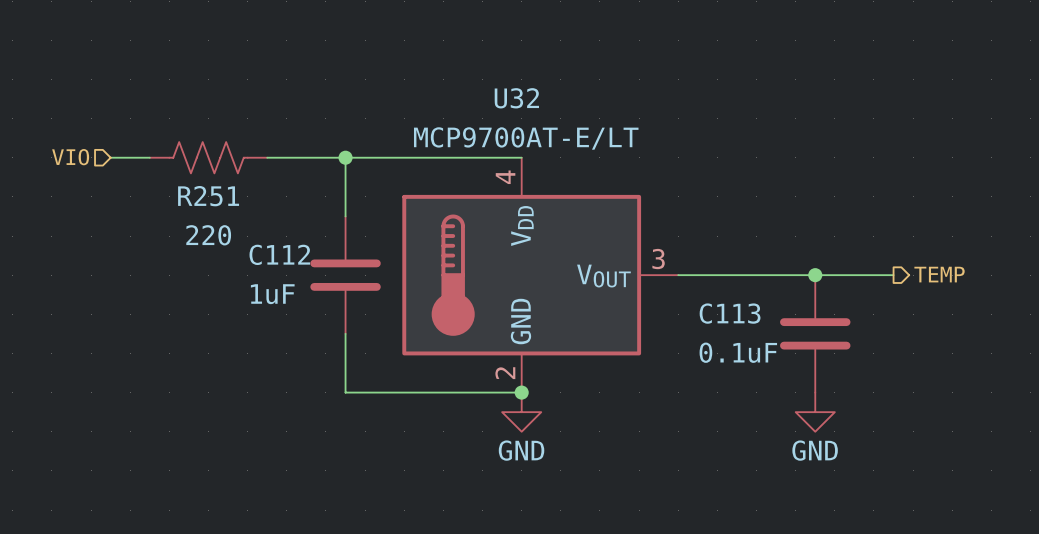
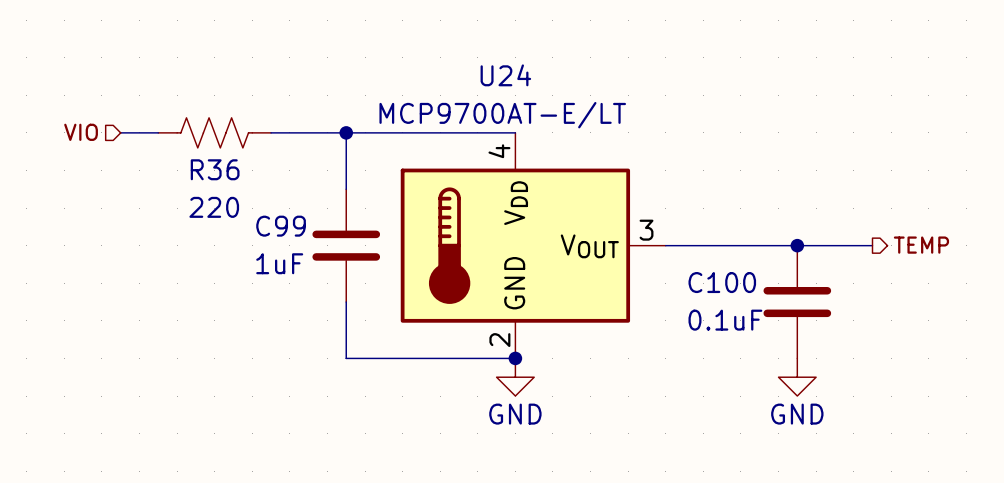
U32 name: U32 (516, 98) -> U24 (505, 75)
R251 name: R251 (208, 196) -> R36 (215, 169)
C112 name: C112 (279, 254) -> C99 (281, 226)
C113 name: C113 (730, 313) -> C100 (722, 282)

